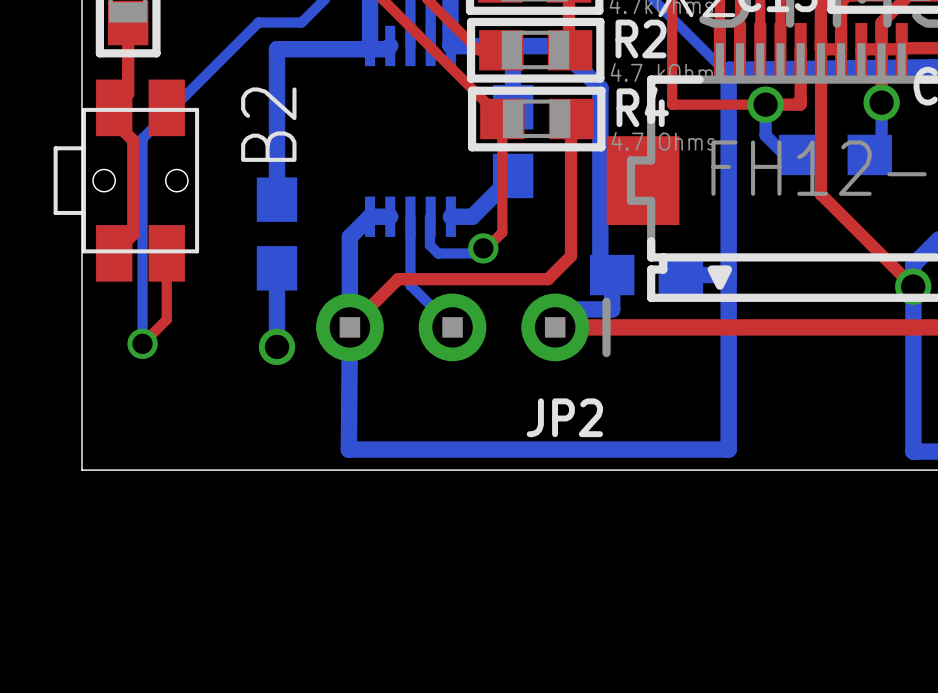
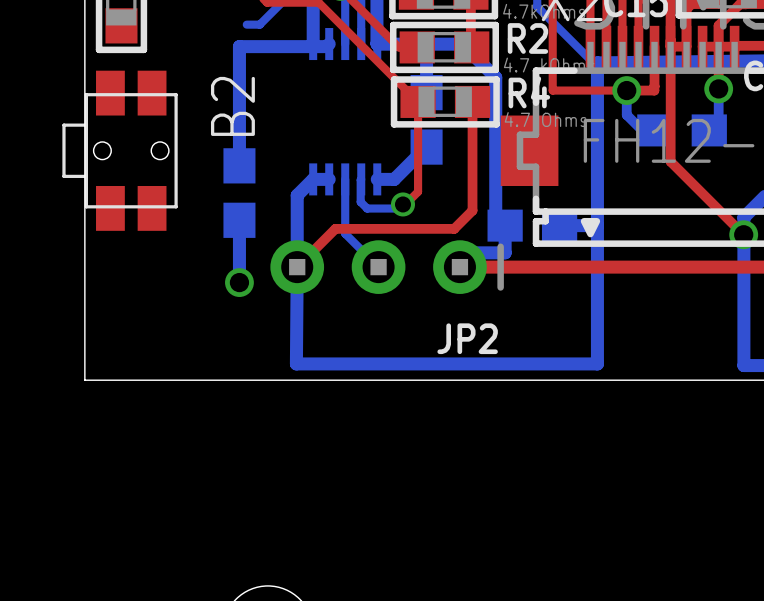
bottom track: (302, 21) (258, 22) (142, 138) (142, 343) -> (259, 24) (246, 24)
top track: (128, 23) (128, 93) (114, 107) (114, 121) (133, 140) (133, 234) (114, 253) -> none
top track: (166, 253) (166, 319) (142, 343) -> none
via: (142, 343) -> none

